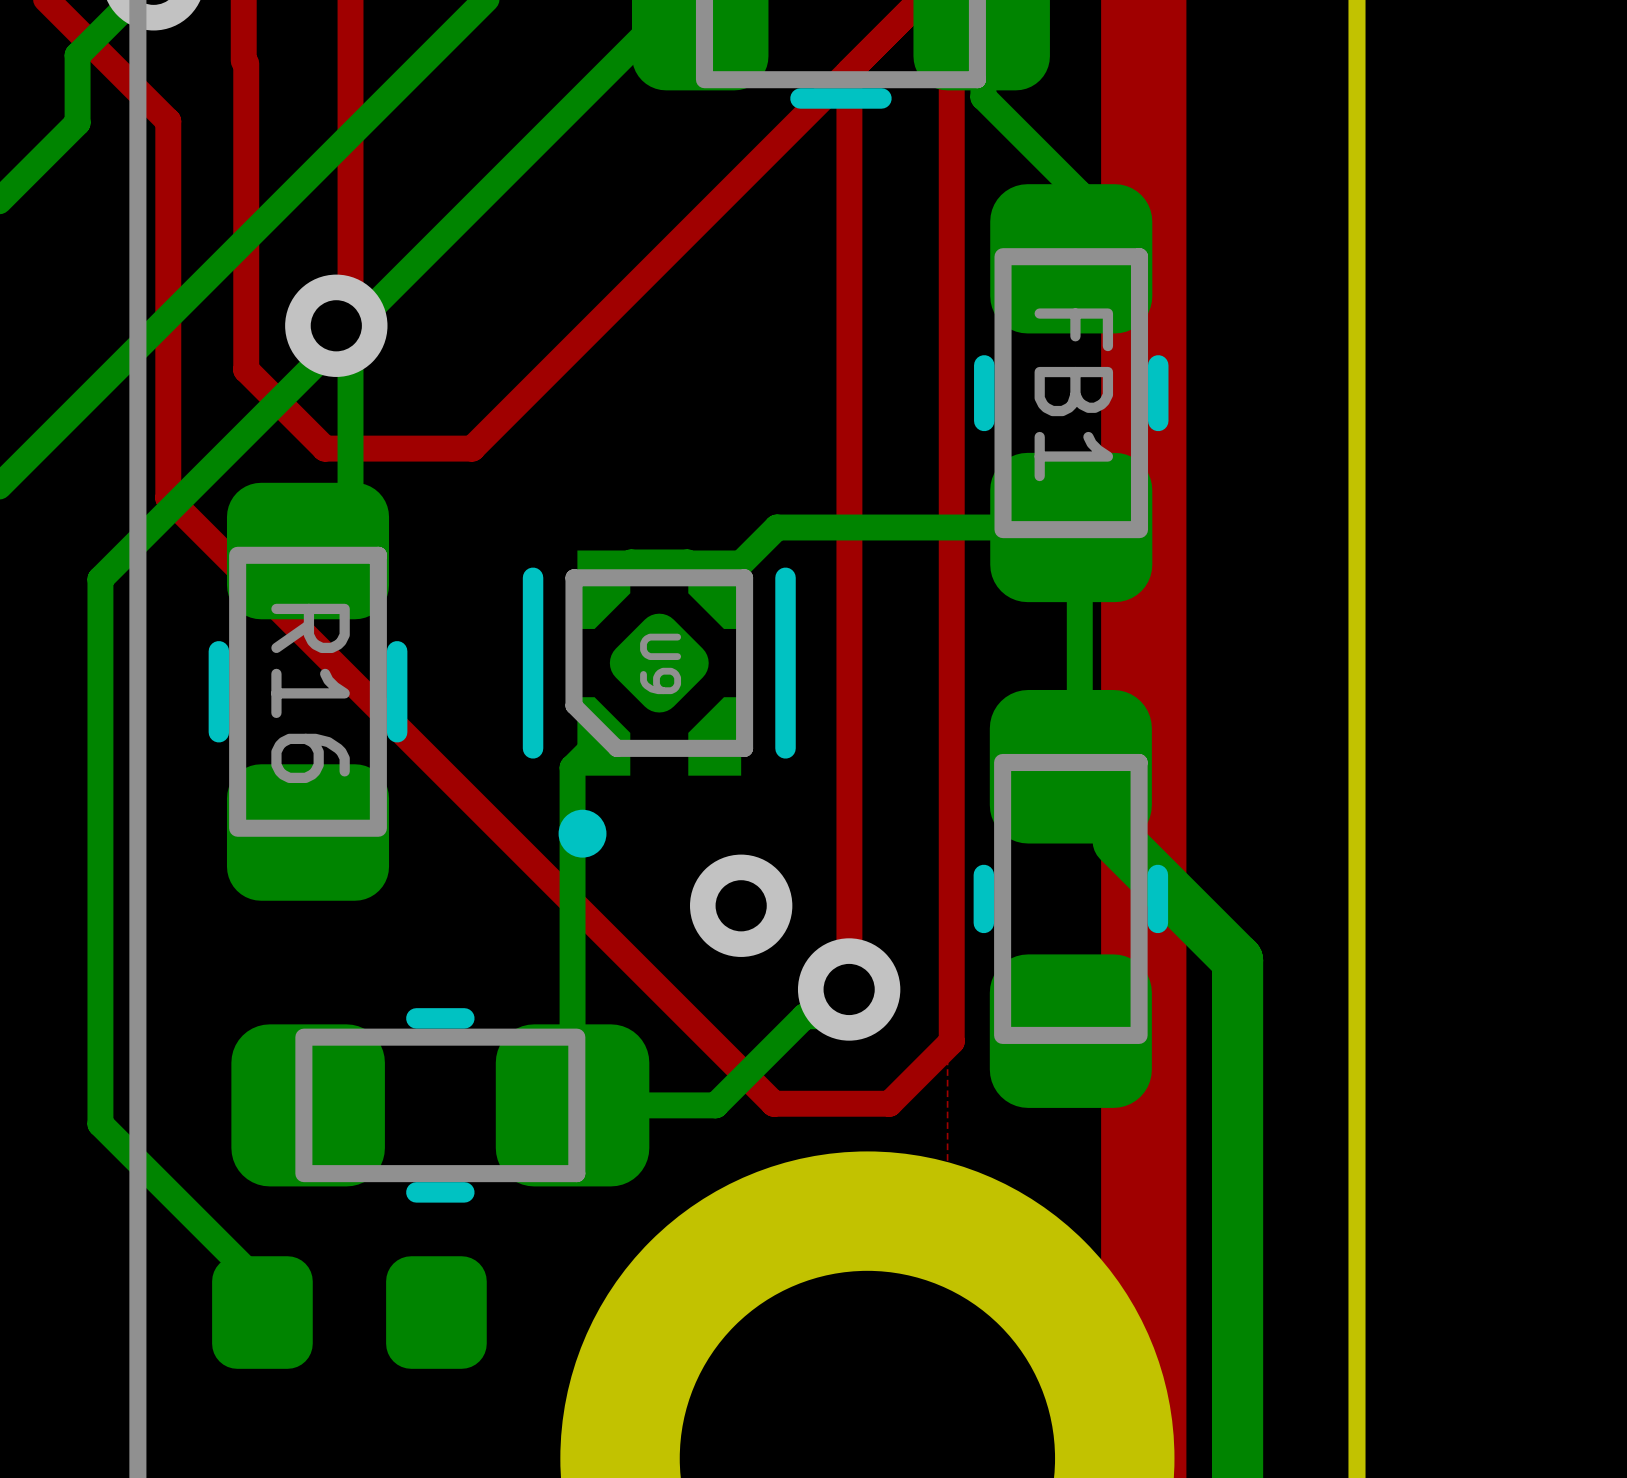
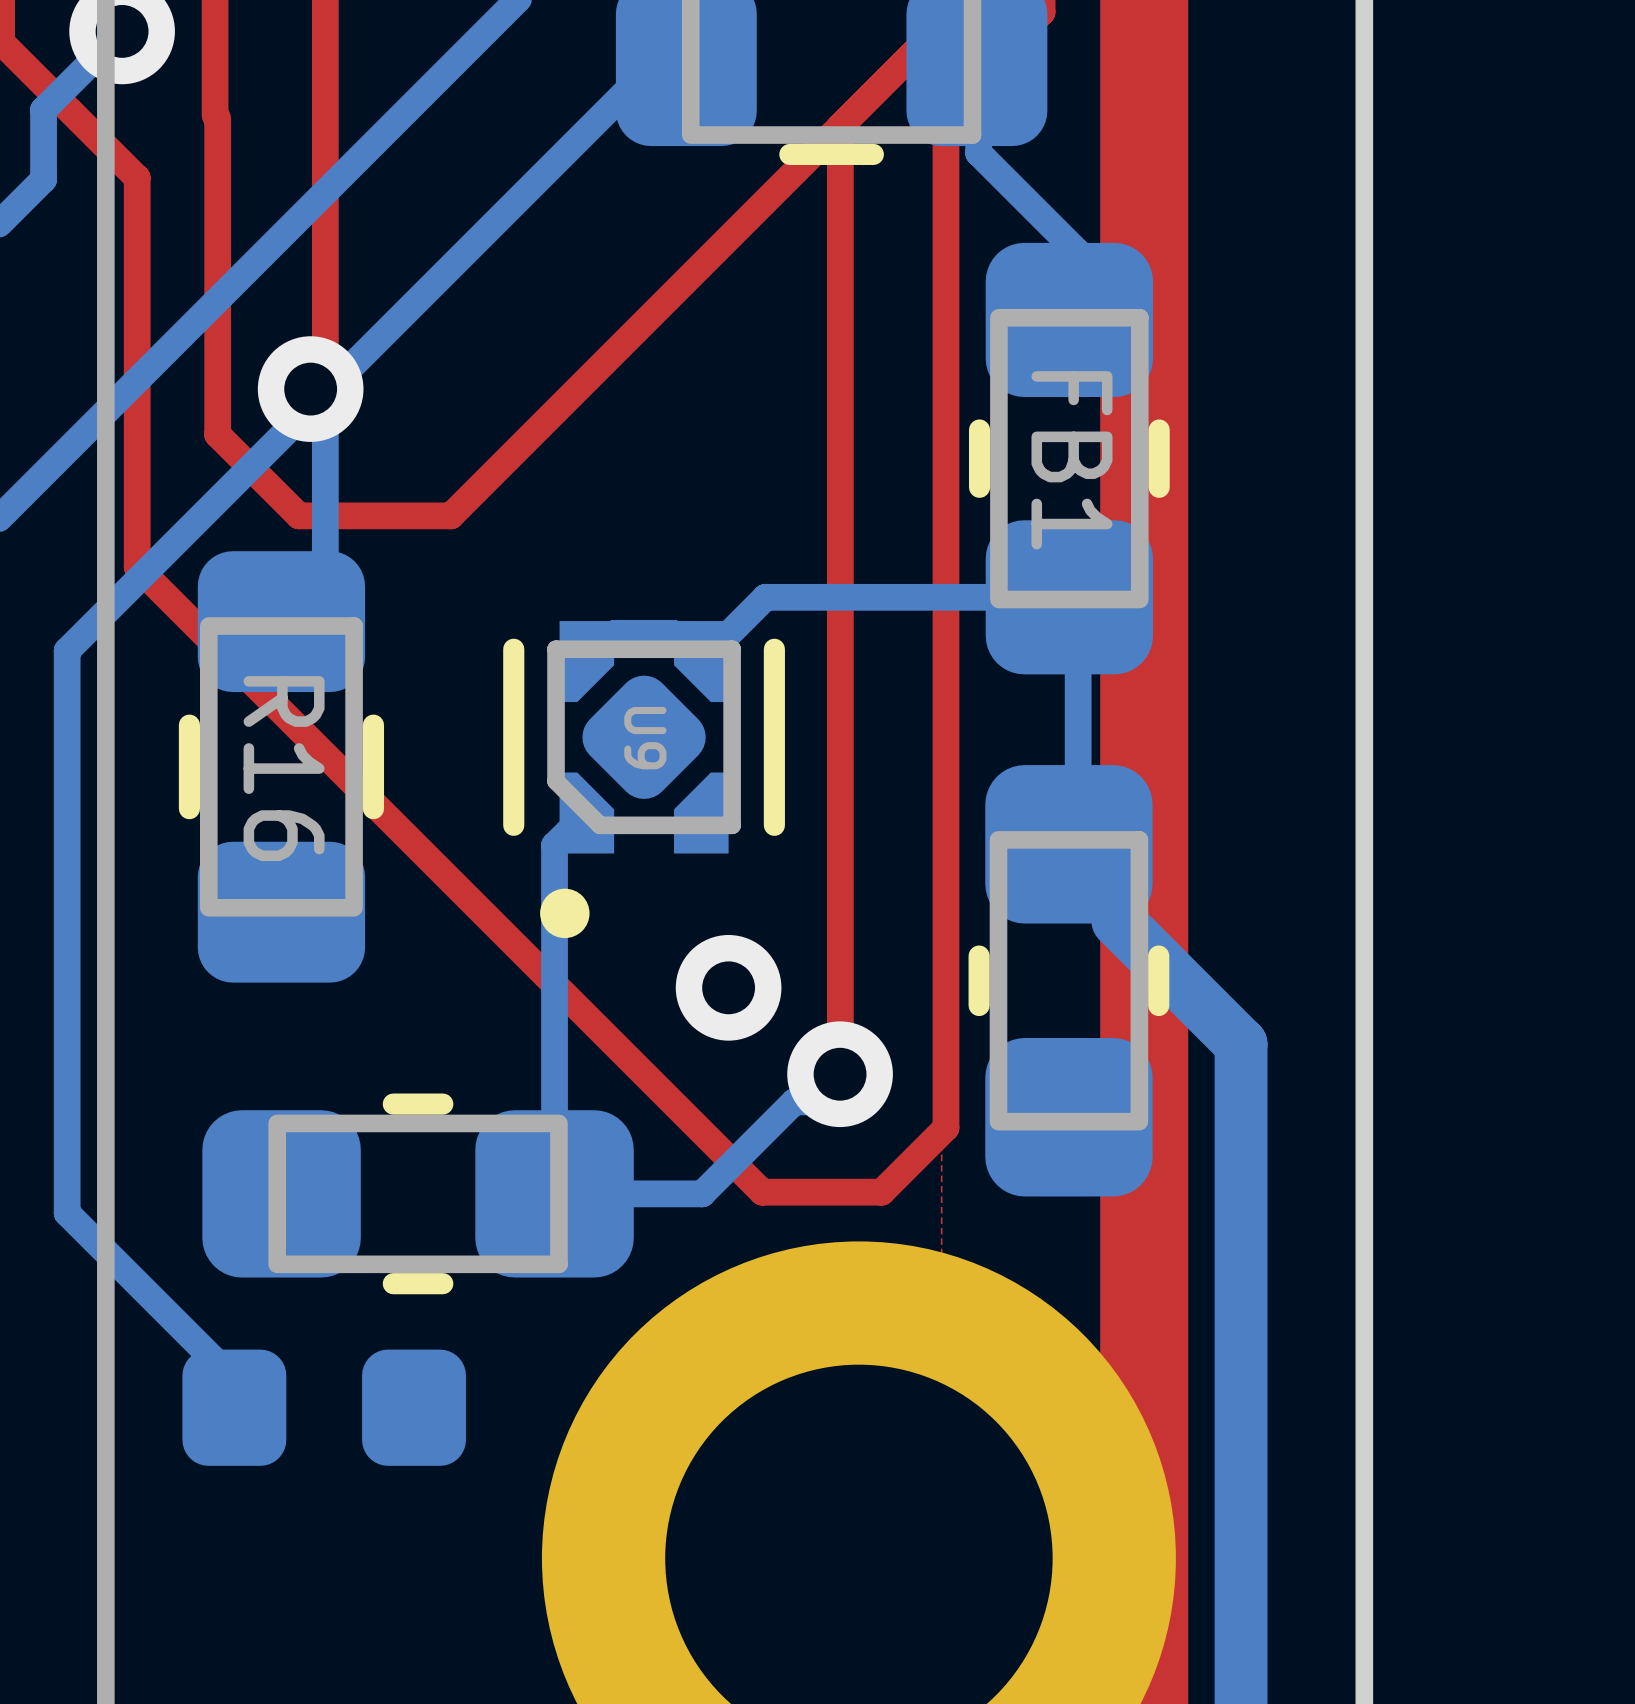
U9 footprint: [522, 550, 796, 858] -> [503, 621, 785, 939]

